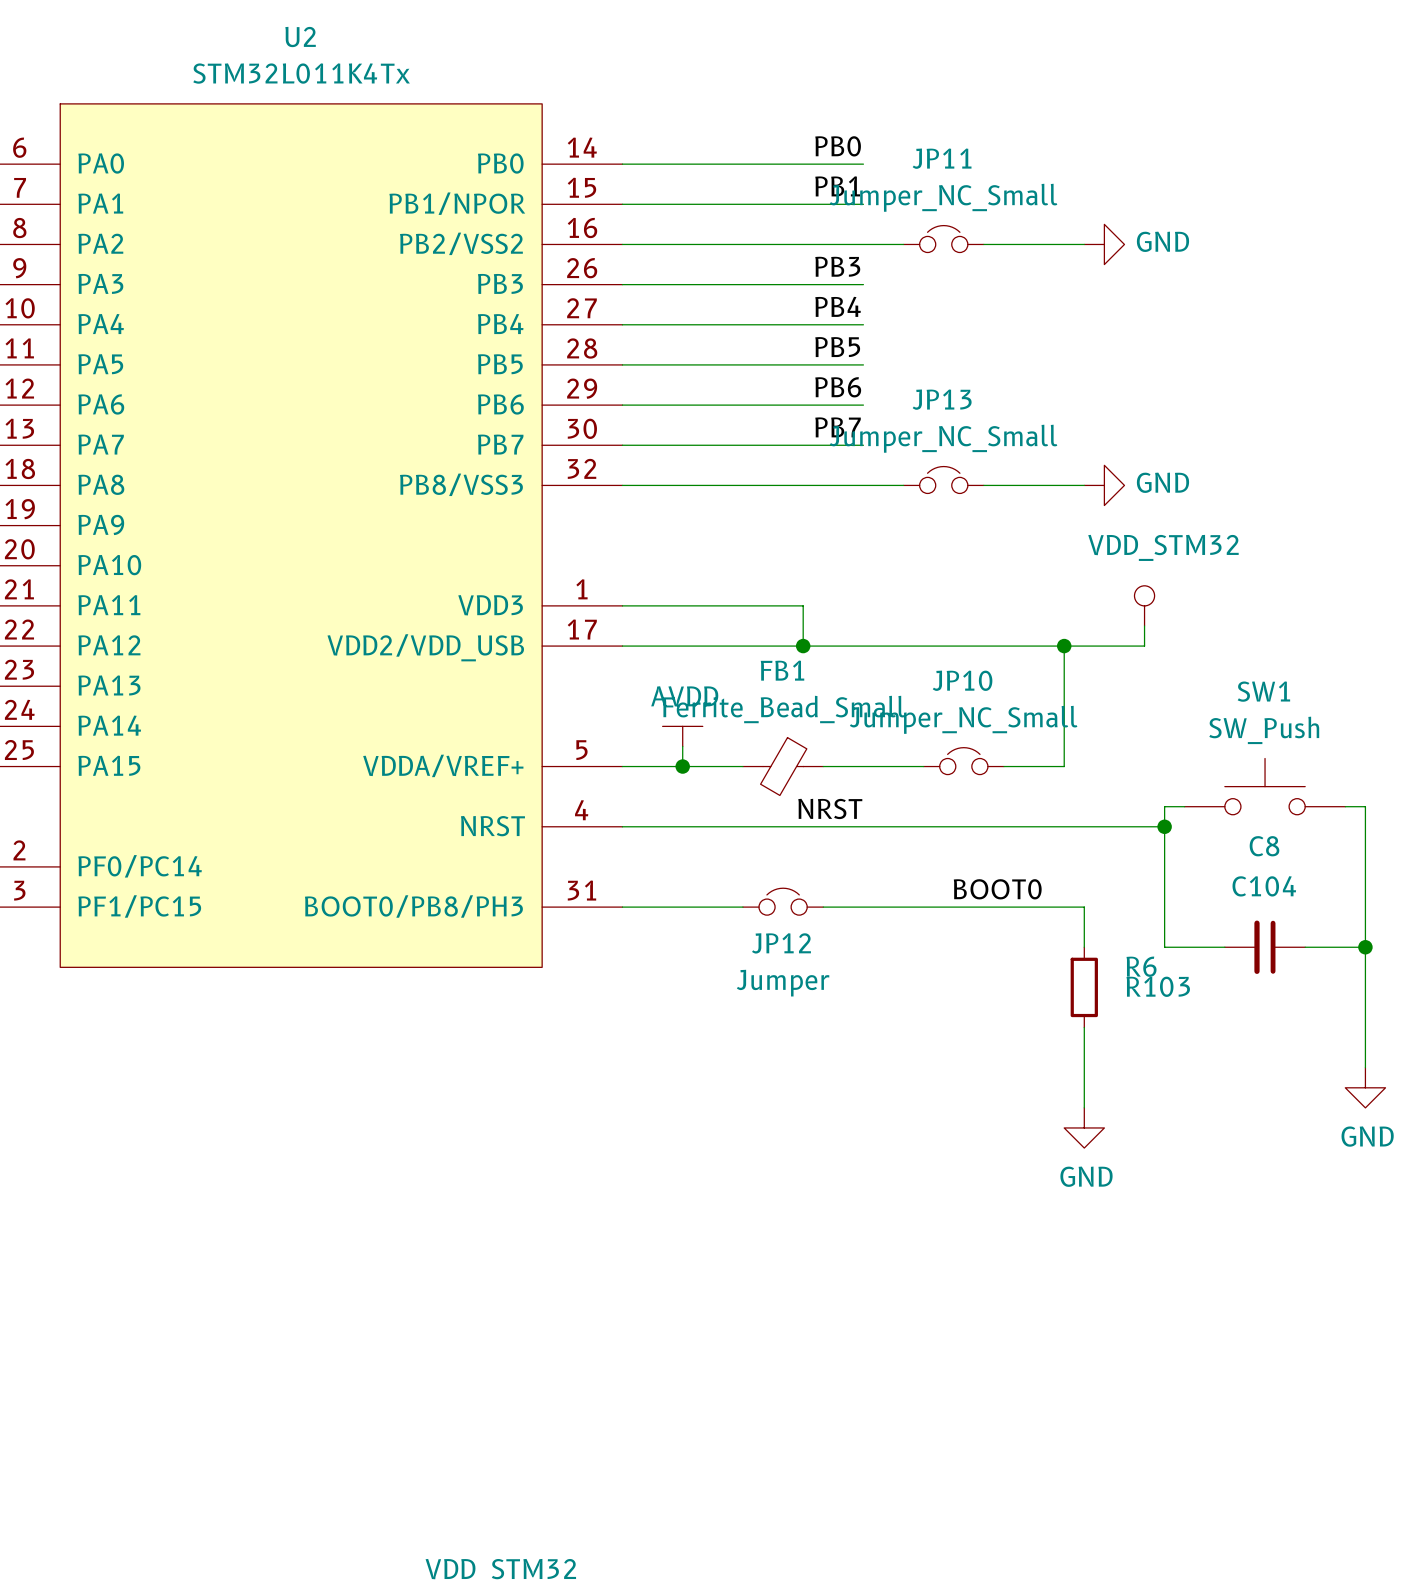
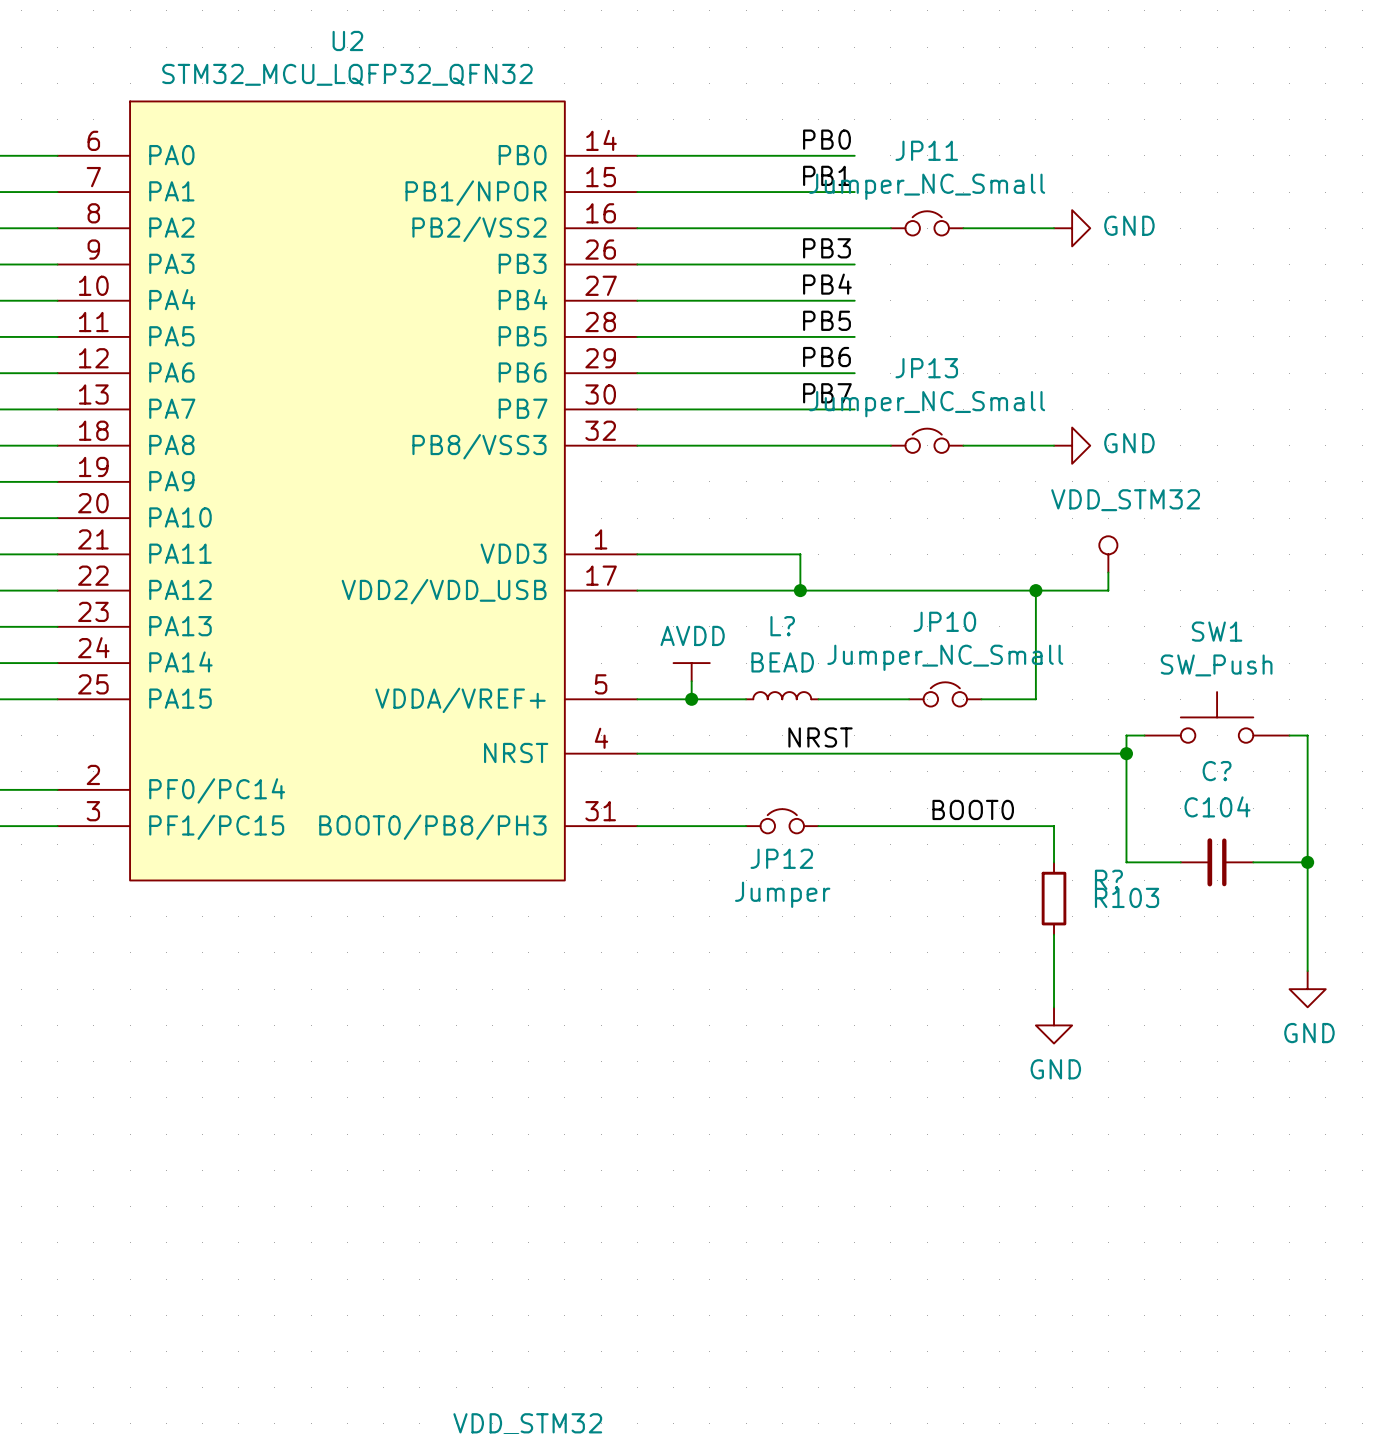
U2 value: STM32L011K4Tx (301, 73) -> STM32_MCU_LQFP32_QFN32 (347, 74)
L?: none -> BEAD (782, 695)
FB1: Ferrite_Bead_Small (783, 766) -> none
C8 name: C8 (1264, 846) -> C? (1217, 771)
R6 name: R6 (1141, 966) -> R? (1108, 879)

